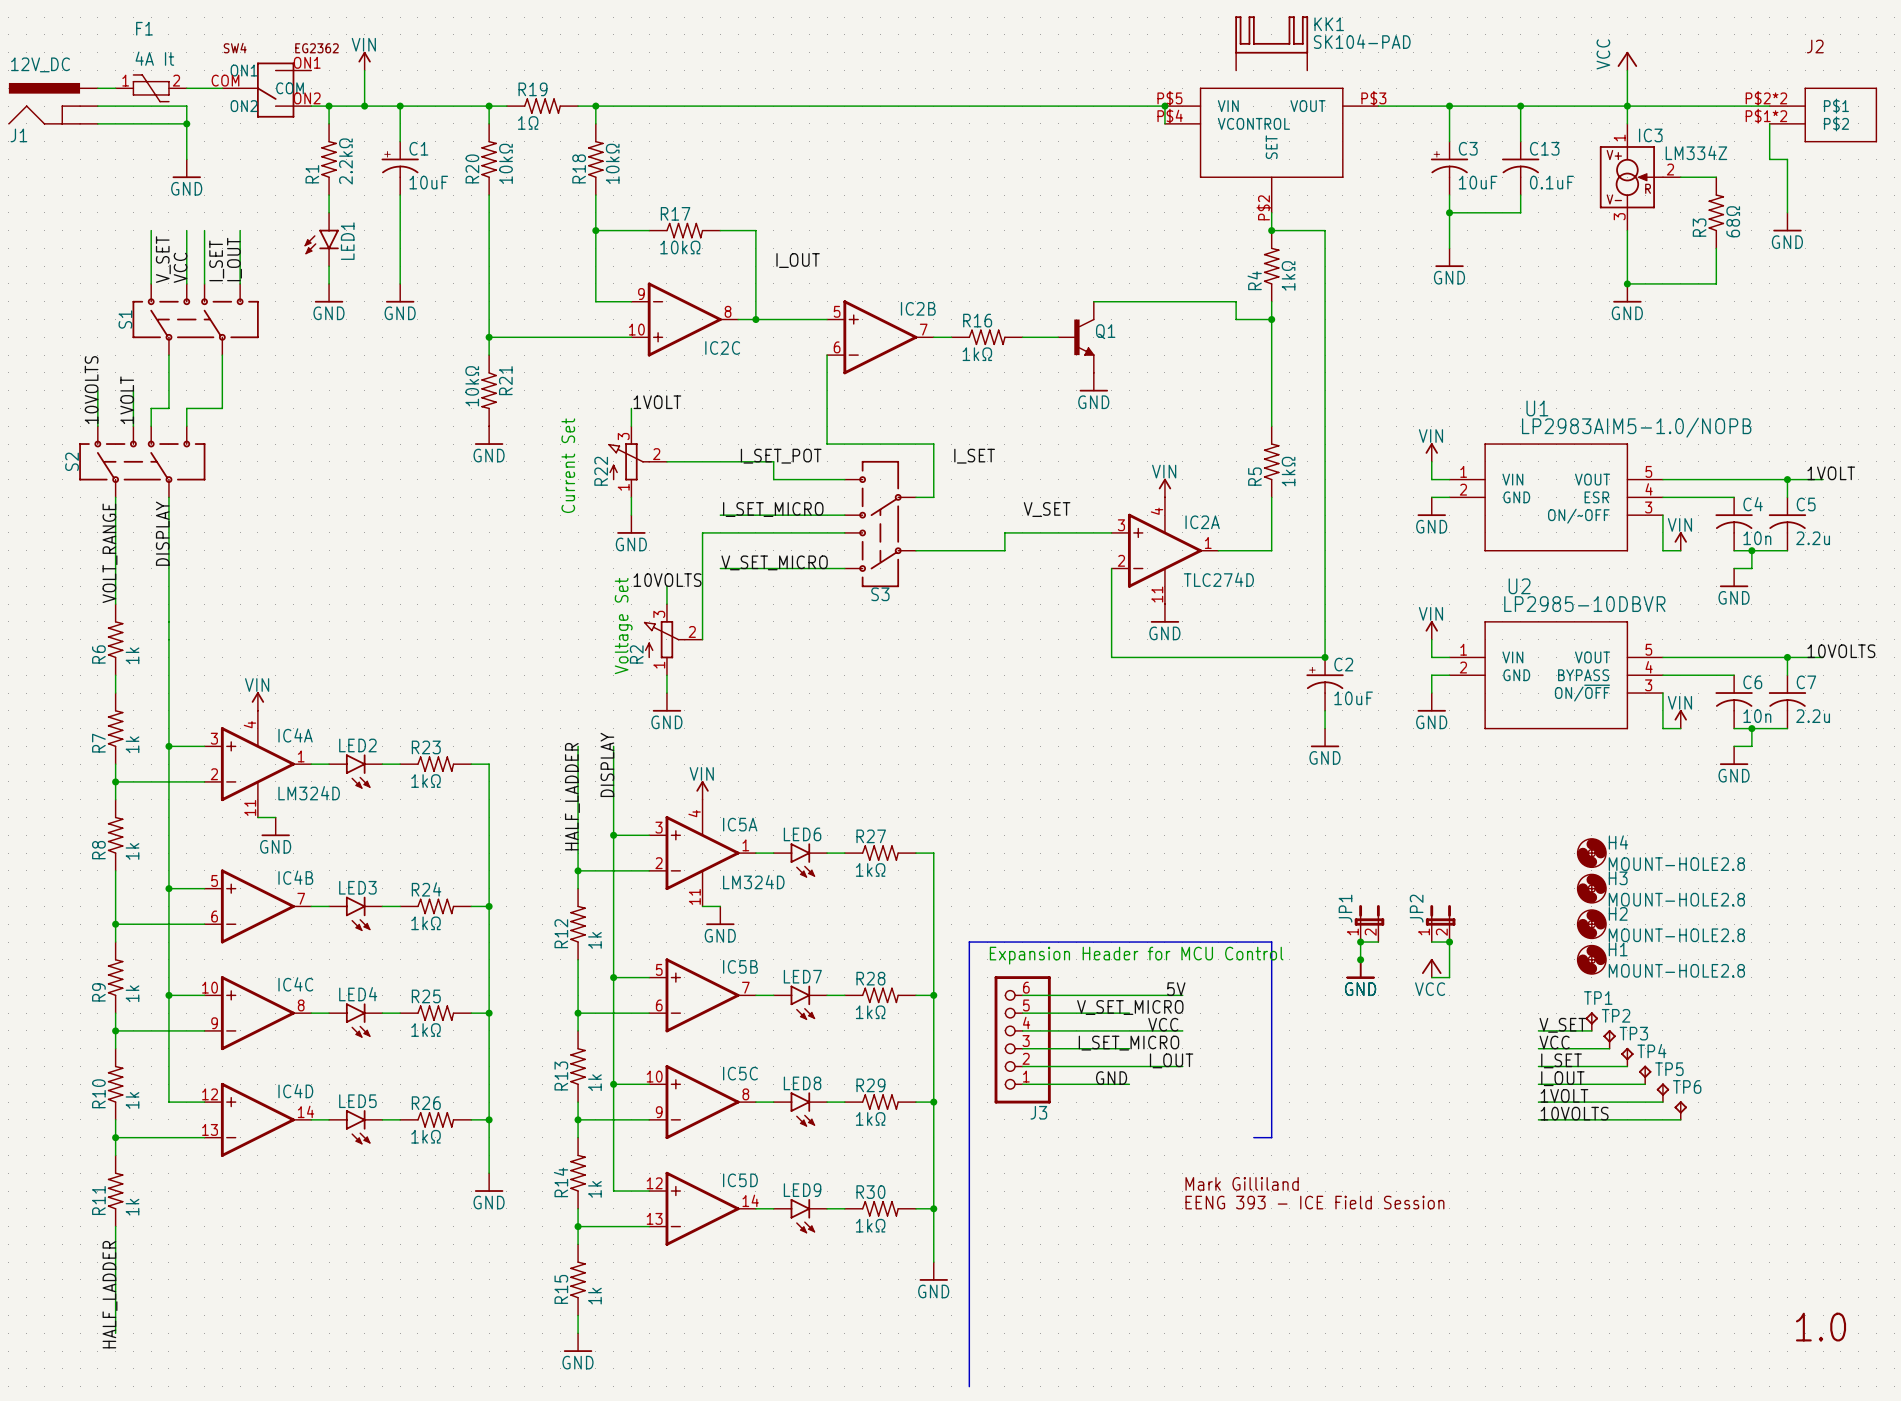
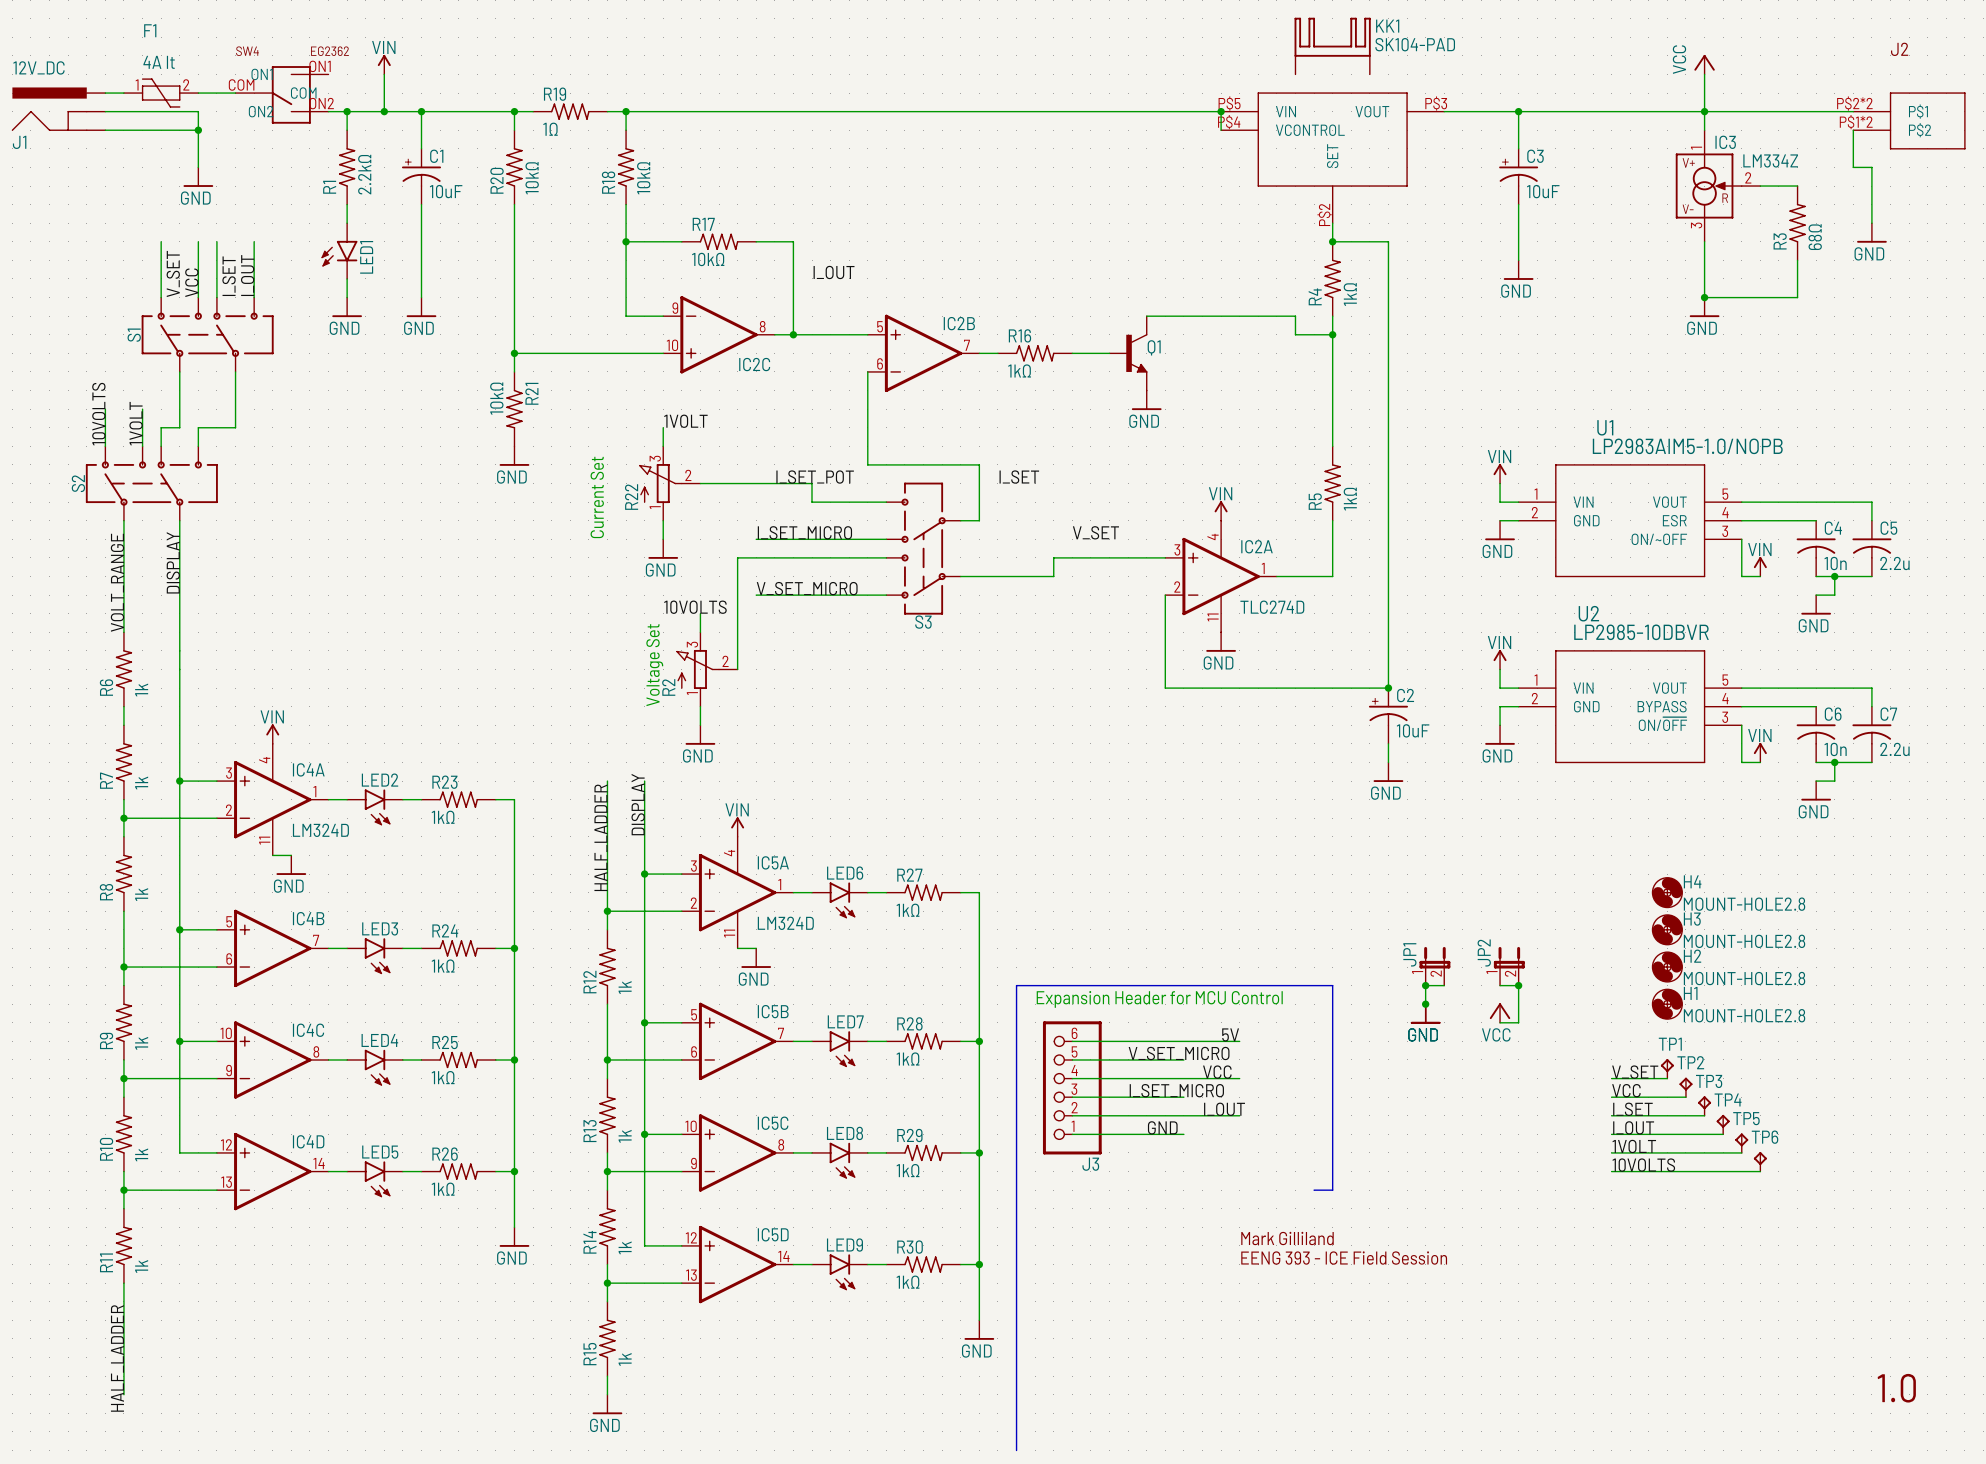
wire: (1520, 106) (1520, 141) -> none
junction: (1520, 106) -> none
C13: 0.1uF (1520, 168) -> none
wire: (1520, 195) (1520, 212) (1449, 212) -> none
junction: (1449, 212) -> none
label: 1VOLT (1831, 473) -> none
wire: (1787, 479) (1823, 479) -> none
junction: (1787, 479) -> none
label: 10VOLTS (1841, 651) -> none
wire: (1787, 657) (1823, 657) -> none
junction: (1787, 657) -> none

